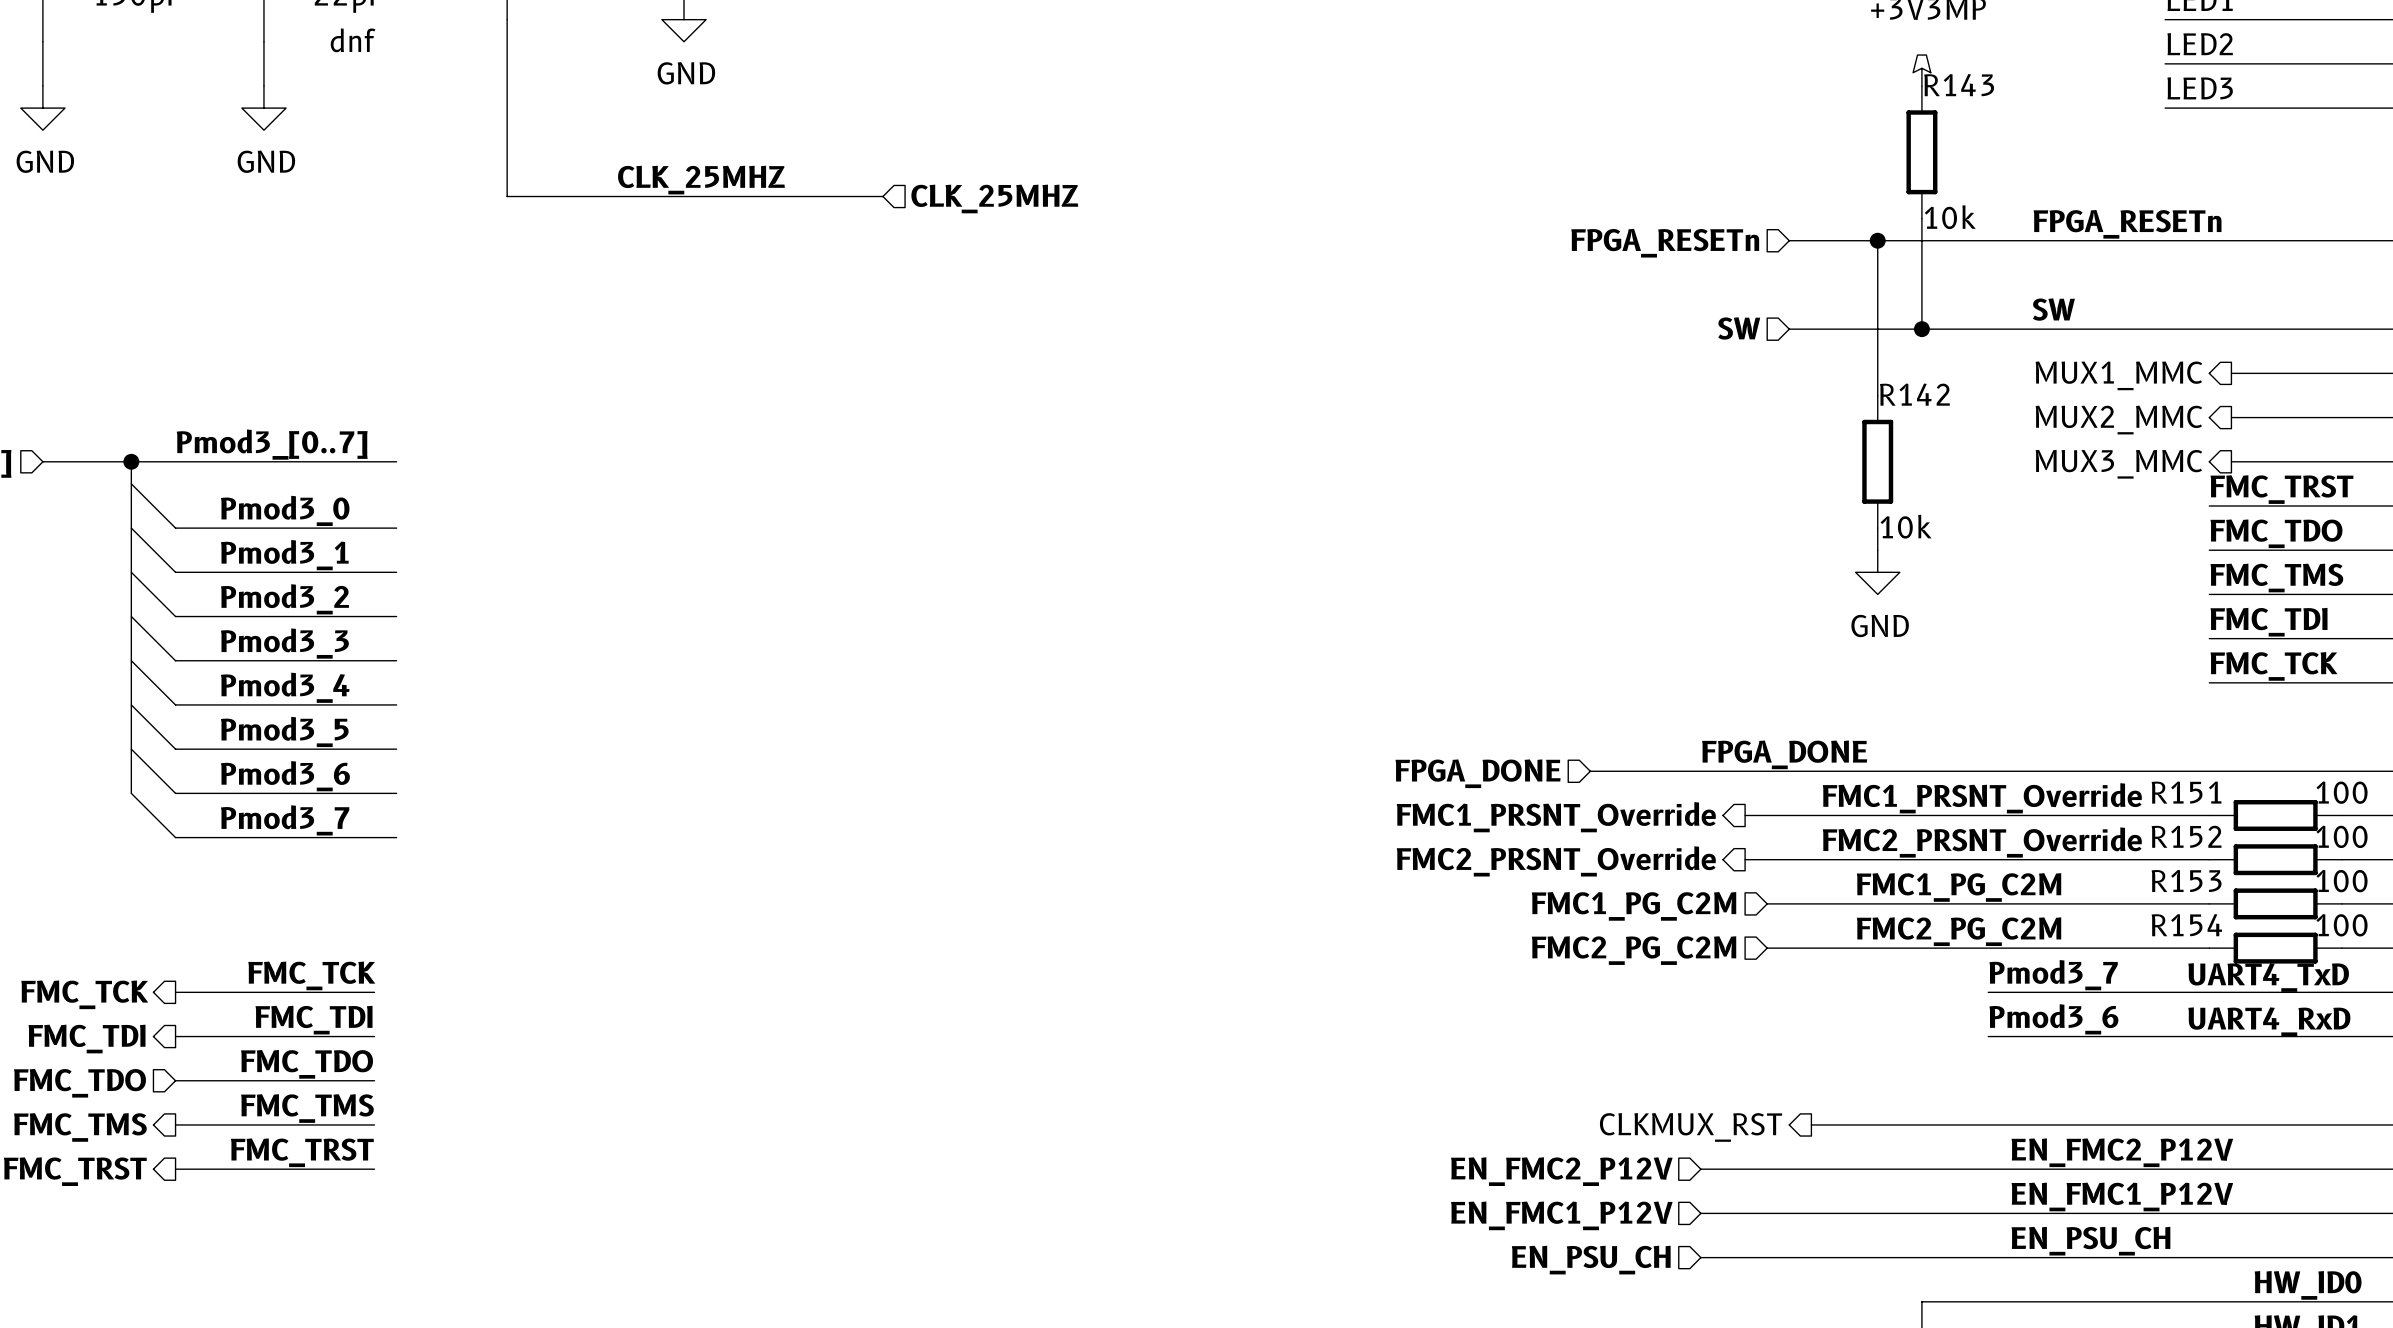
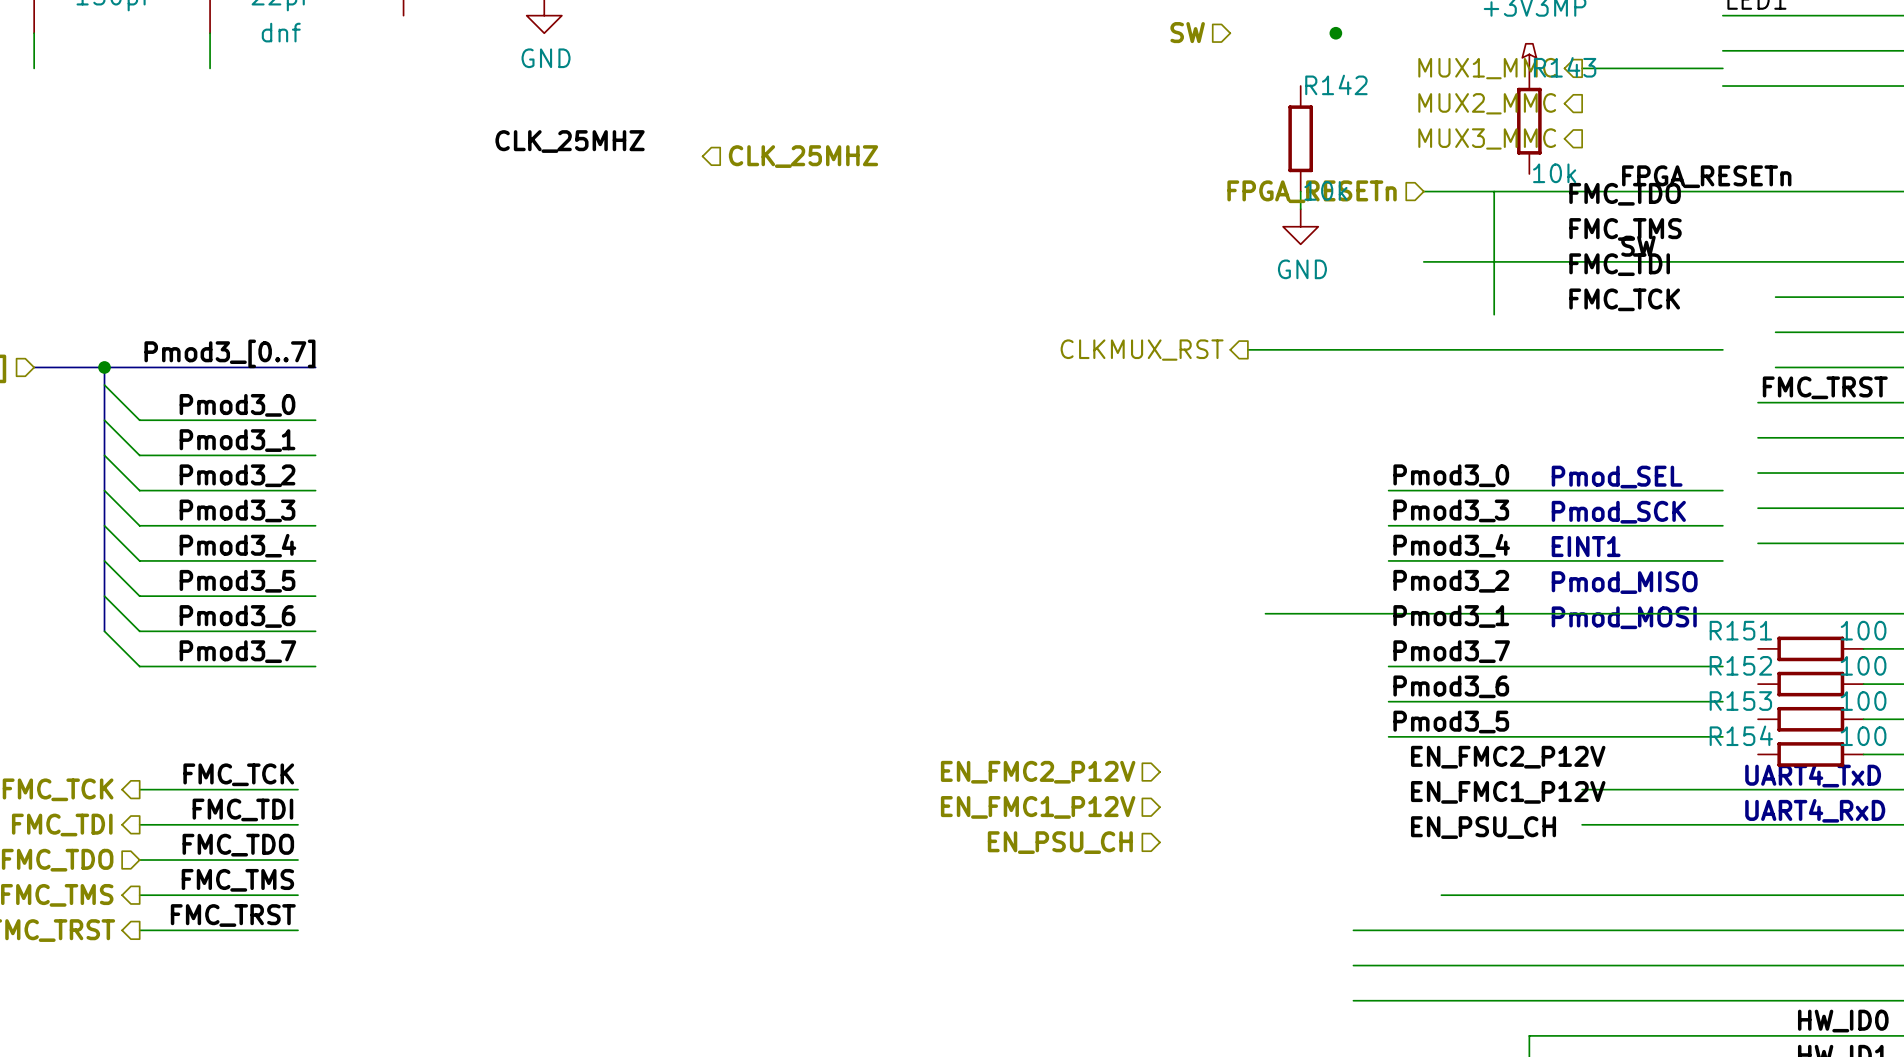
wire: (507, 19) (507, 196) (882, 196) -> none
junction: none -> (1335, 33)
label: LED2 (2200, 44) -> none
wire: none -> (1582, 68) (1722, 68)
label: LED3 (2200, 88) -> none
power symbol: GND (42, 108) -> none
power symbol: GND (263, 108) -> none
wire: (1921, 218) (1921, 329) -> none
junction: (1877, 240) -> none
hierarchical label position: SW (1739, 328) -> SW (1187, 32)
junction: (1921, 329) -> none
hierarchical label position: MUX1_MMC (2118, 375) -> MUX1_MMC (1487, 68)
hierarchical label position: MUX2_MMC (2118, 420) -> MUX2_MMC (1487, 103)
wire: none -> (1247, 349) (1722, 349)
hierarchical label: none -> CLKMUX_RST (1142, 350)
R142 position: (1877, 461) -> (1300, 138)
hierarchical label position: MUX3_MMC (2118, 464) -> MUX3_MMC (1487, 138)
wire: (1877, 528) (1877, 550) -> (1300, 191) (1300, 209)
label position: FMC_TDO (2276, 533) -> FMC_TDO (1625, 194)
power symbol position: GND (1877, 572) -> GND (1300, 226)
label position: FMC_TMS (2276, 578) -> FMC_TMS (1625, 229)
label: none -> Pmod3_0 (1451, 475)
text: none -> Pmod_SEL (1617, 477)
wire: none -> (1388, 490) (1722, 490)
label position: FMC_TDI (2269, 622) -> FMC_TDI (1619, 264)
label: none -> Pmod3_3 (1451, 510)
text: none -> Pmod_SCK (1618, 512)
wire: none -> (1388, 525) (1722, 525)
label position: FMC_TCK (2274, 666) -> FMC_TCK (1624, 299)
text: none -> EINT1 (1586, 546)
label: none -> Pmod3_4 (1451, 545)
wire: none -> (1388, 560) (1722, 560)
label: none -> Pmod3_2 (1451, 581)
text: none -> Pmod_MISO (1624, 582)
label: FPGA_DONE (1784, 754) -> none
hierarchical label: FPGA_DONE (1478, 773) -> none
label: none -> Pmod3_1 (1451, 616)
text: none -> Pmod_MOSI (1624, 617)
label: FMC1_PRSNT_Override (1982, 798) -> none
wire: (1745, 815) (2209, 815) -> none
hierarchical label: FMC1_PRSNT_Override (1556, 817) -> none
wire: none -> (1388, 666) (1722, 666)
label: FMC2_PRSNT_Override (1982, 842) -> none
wire: (1745, 859) (2209, 859) -> none
hierarchical label: FMC2_PRSNT_Override (1556, 861) -> none
wire: none -> (1388, 701) (1722, 701)
label: FMC1_PG_C2M (1959, 887) -> none
wire: (1767, 903) (2209, 903) -> none
hierarchical label: FMC1_PG_C2M (1634, 906) -> none
label: none -> Pmod3_5 (1451, 722)
wire: none -> (1388, 736) (1722, 736)
label: FMC2_PG_C2M (1959, 931) -> none
wire: (1767, 948) (2209, 948) -> none
hierarchical label: FMC2_PG_C2M (1634, 950) -> none
label position: Pmod3_7 (2053, 975) -> Pmod3_7 (1451, 651)
label position: Pmod3_6 (2053, 1019) -> Pmod3_6 (1451, 686)
hierarchical label: CLKMUX_RST (1691, 1127) -> none
label position: EN_FMC2_P12V (2122, 1152) -> EN_FMC2_P12V (1508, 757)
hierarchical label position: EN_FMC2_P12V (1561, 1171) -> EN_FMC2_P12V (1038, 772)
label position: EN_FMC1_P12V (2122, 1196) -> EN_FMC1_P12V (1508, 792)
hierarchical label position: EN_FMC1_P12V (1561, 1215) -> EN_FMC1_P12V (1038, 807)
label position: EN_PSU_CH (2090, 1241) -> EN_PSU_CH (1483, 827)
hierarchical label position: EN_PSU_CH (1591, 1260) -> EN_PSU_CH (1060, 842)

